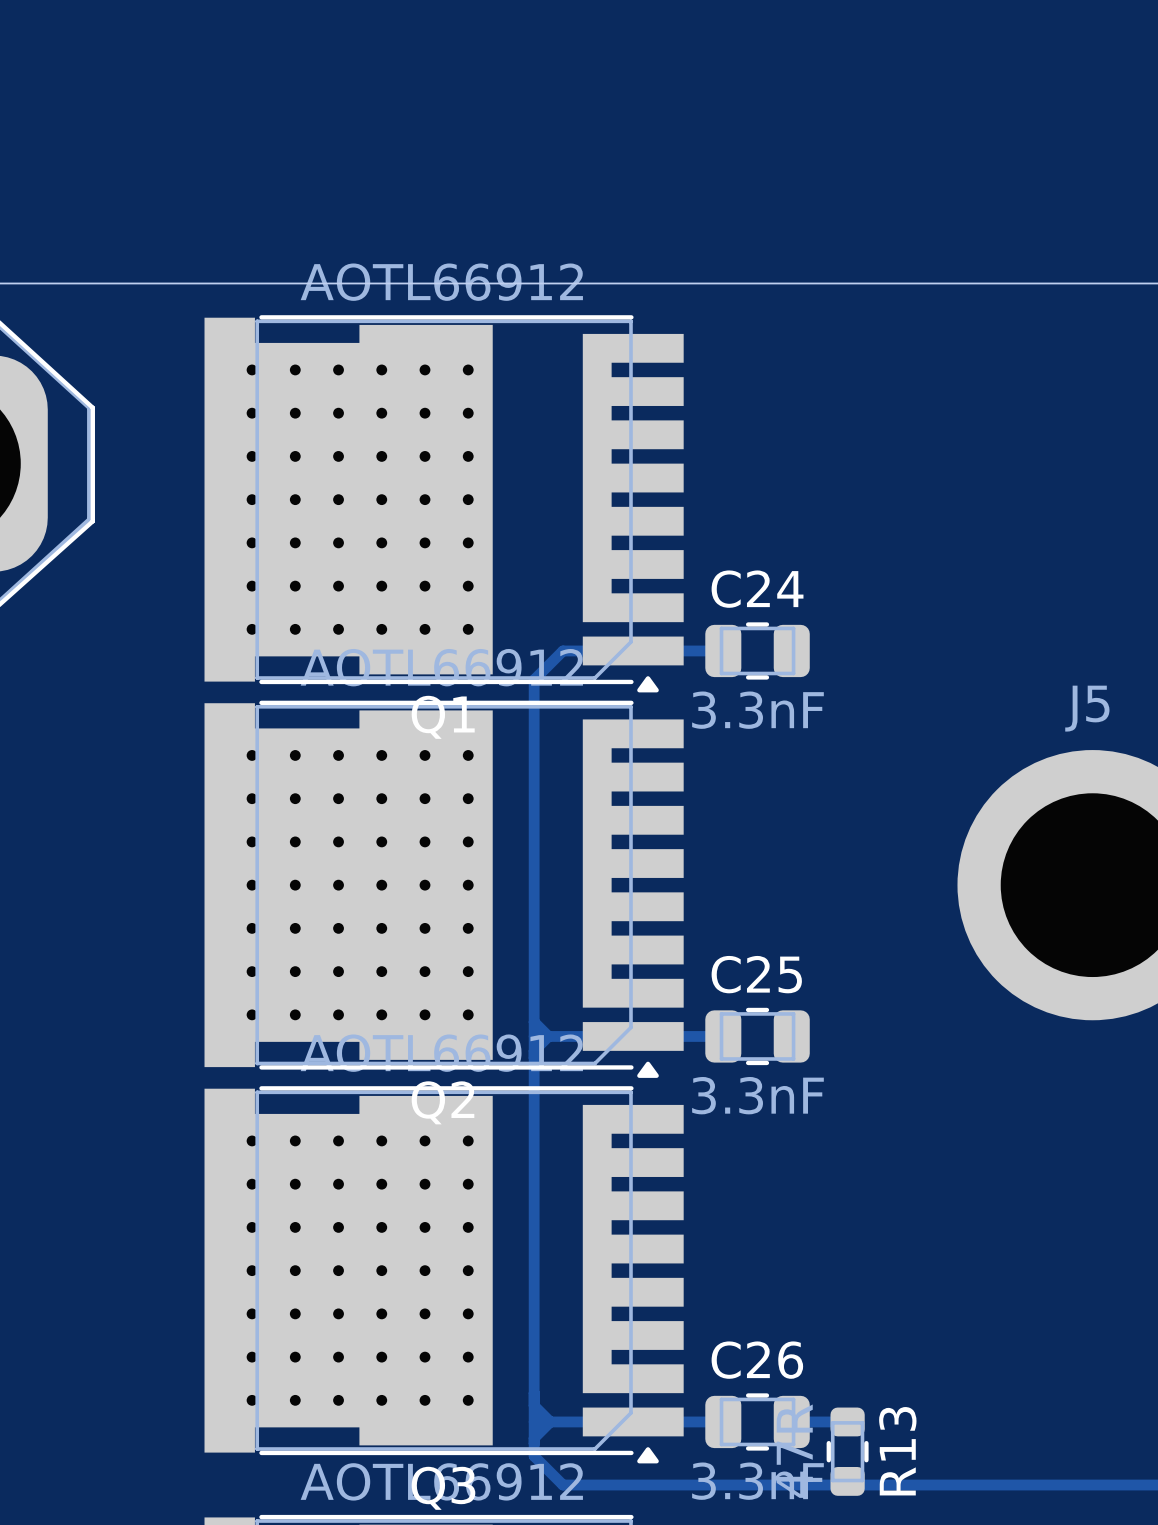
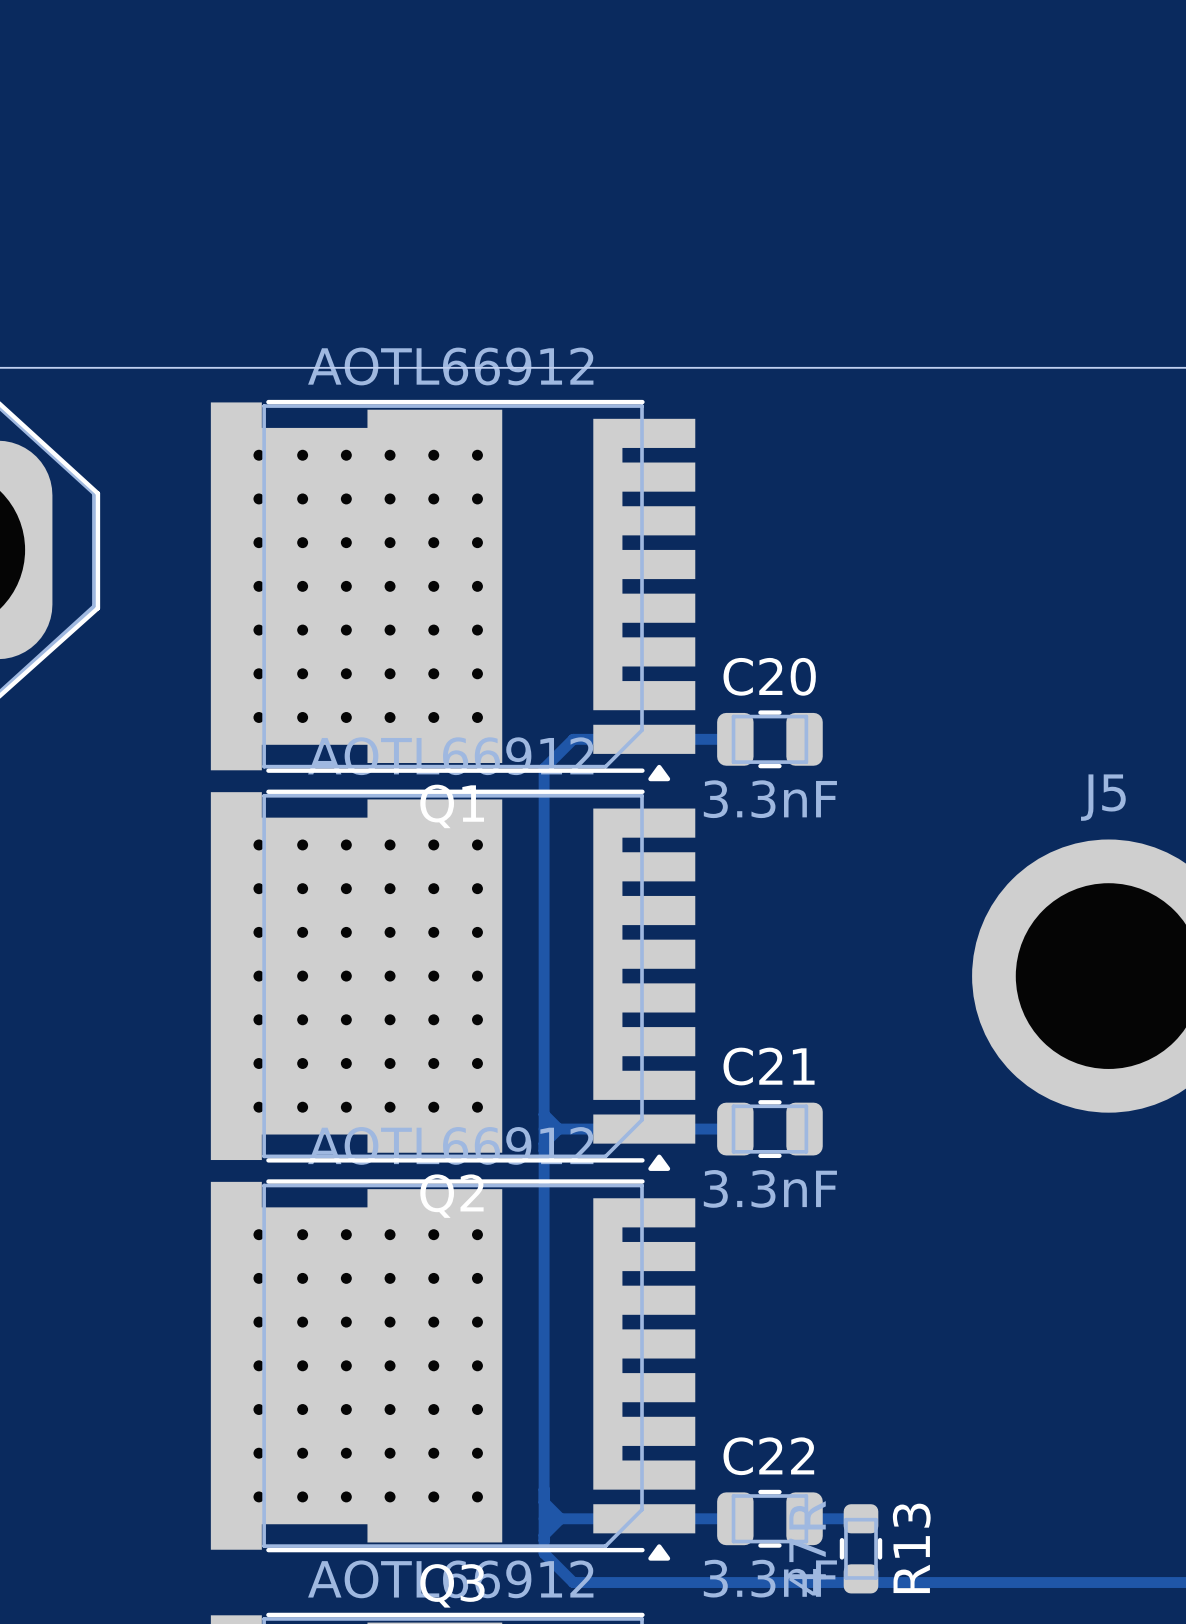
C24 name: C24 (757, 589) -> C20 (769, 676)
C25 name: C25 (756, 974) -> C21 (769, 1066)
C26 name: C26 (757, 1360) -> C22 (768, 1456)

